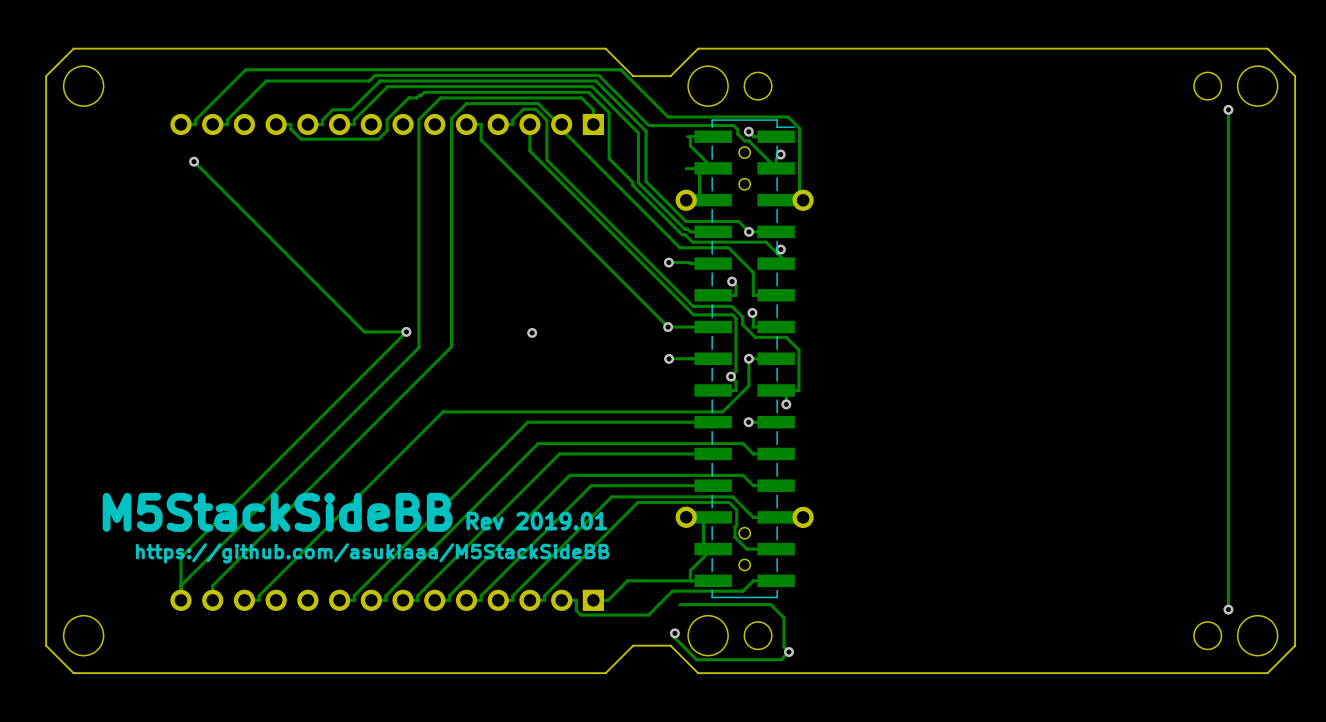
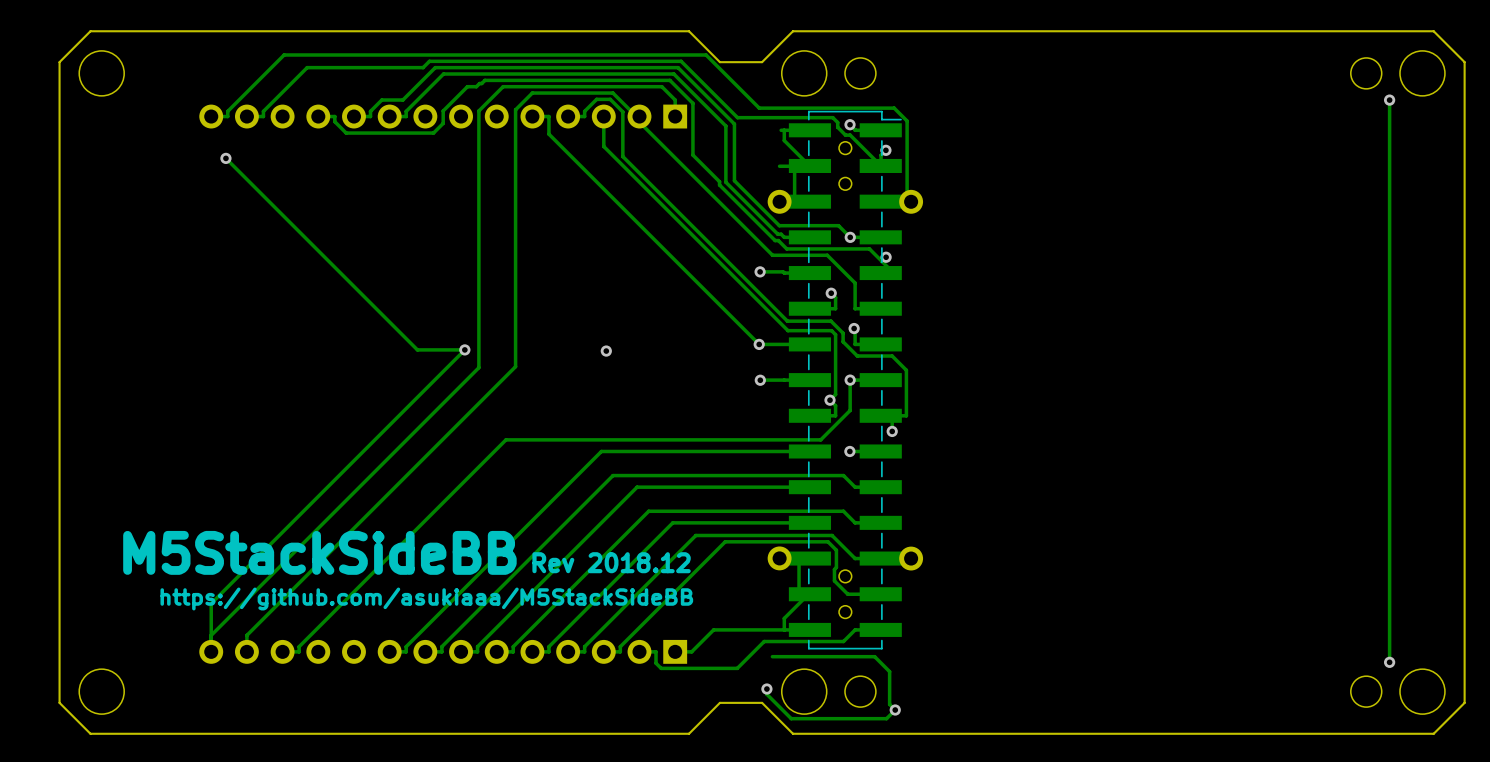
text: Rev 2019.01 (536, 521) -> Rev 2018.12 (611, 562)

